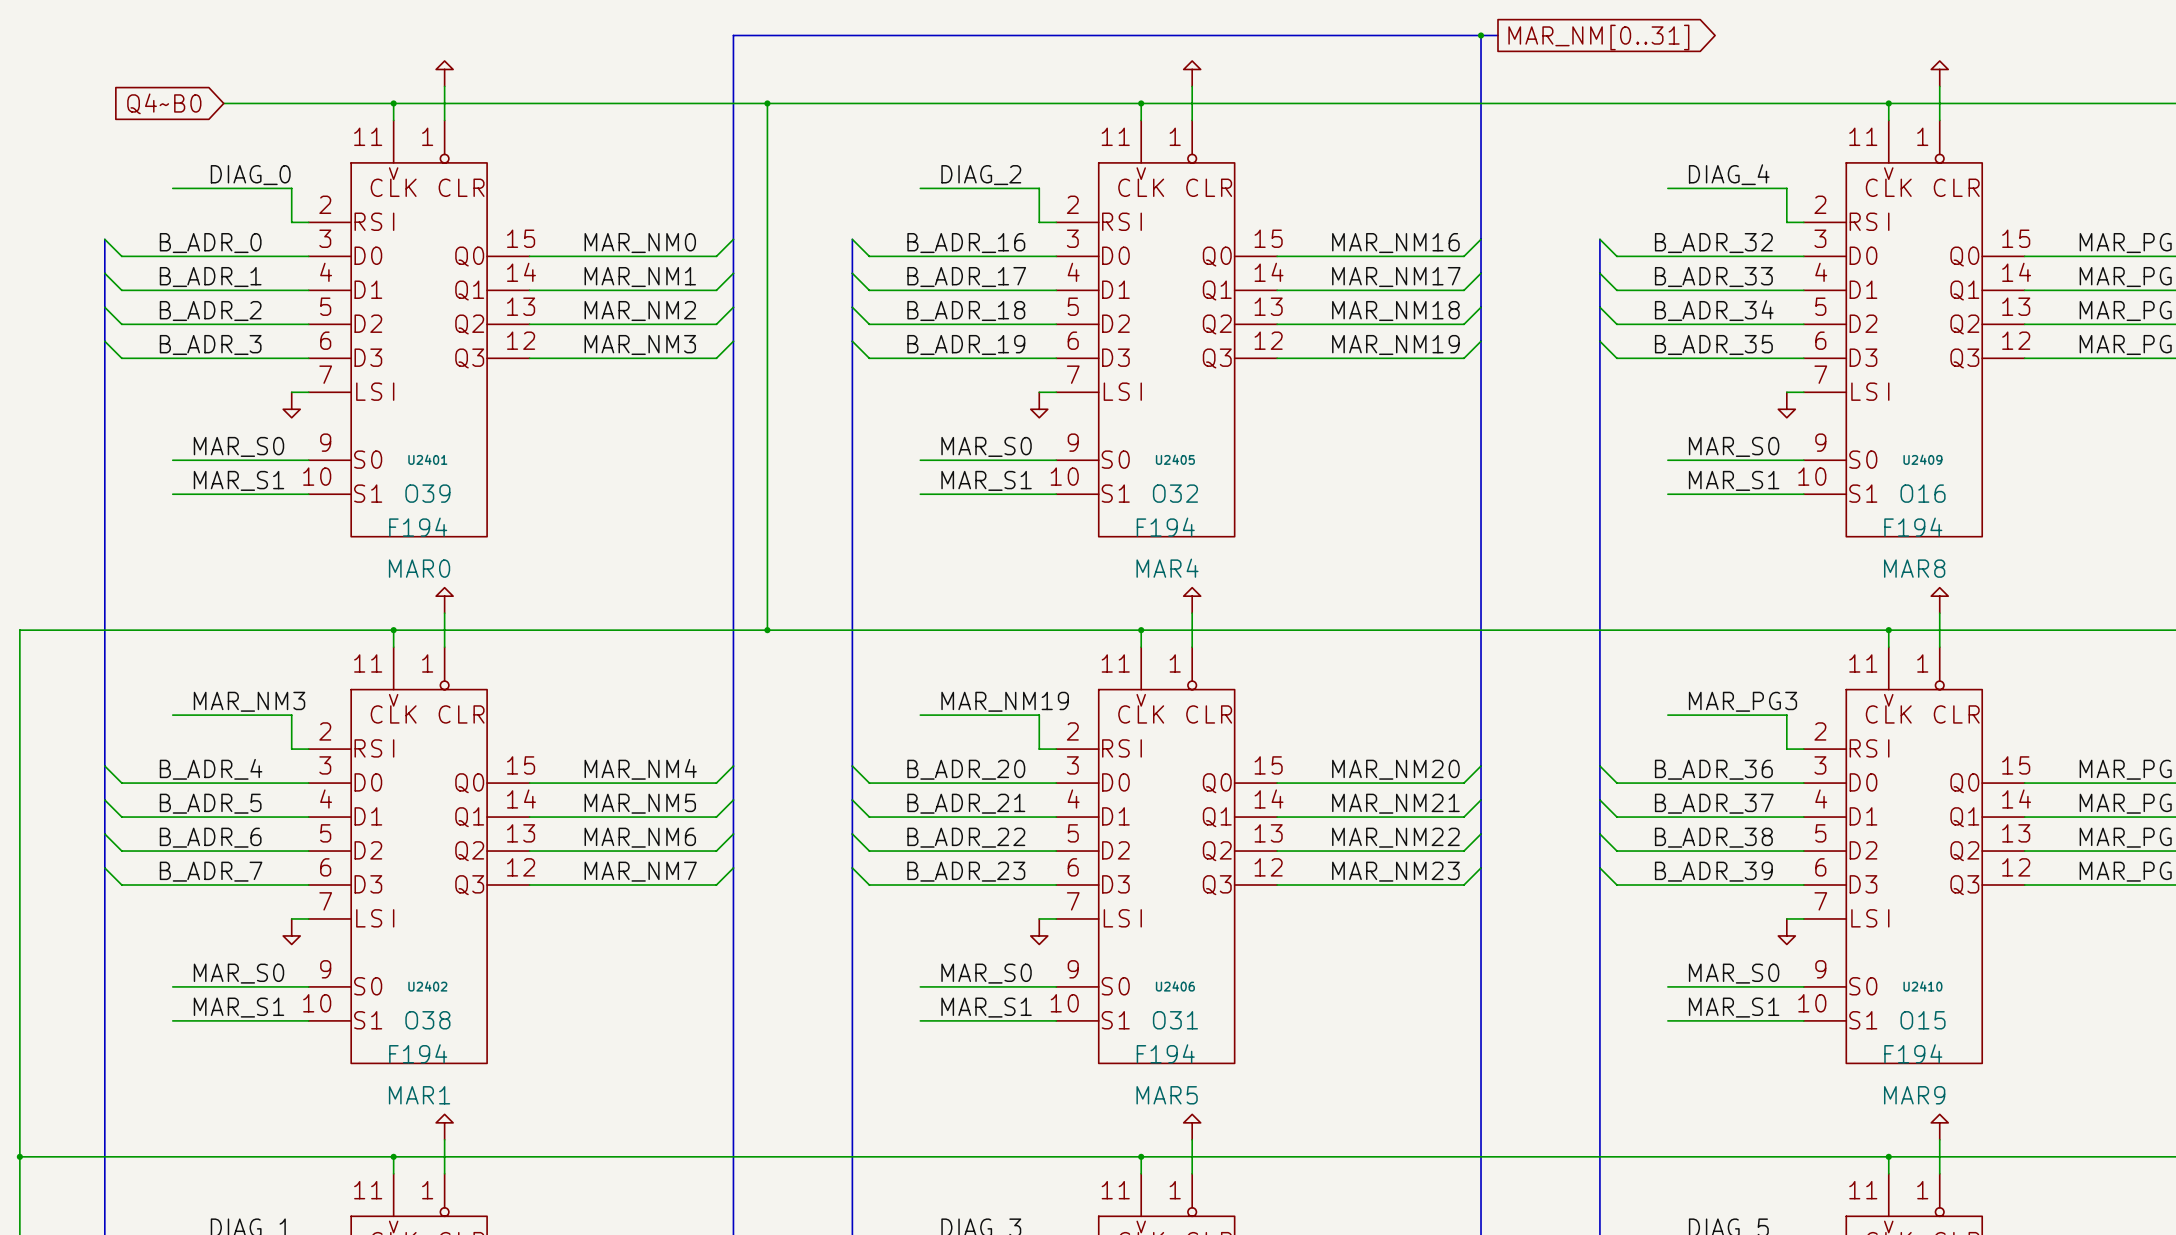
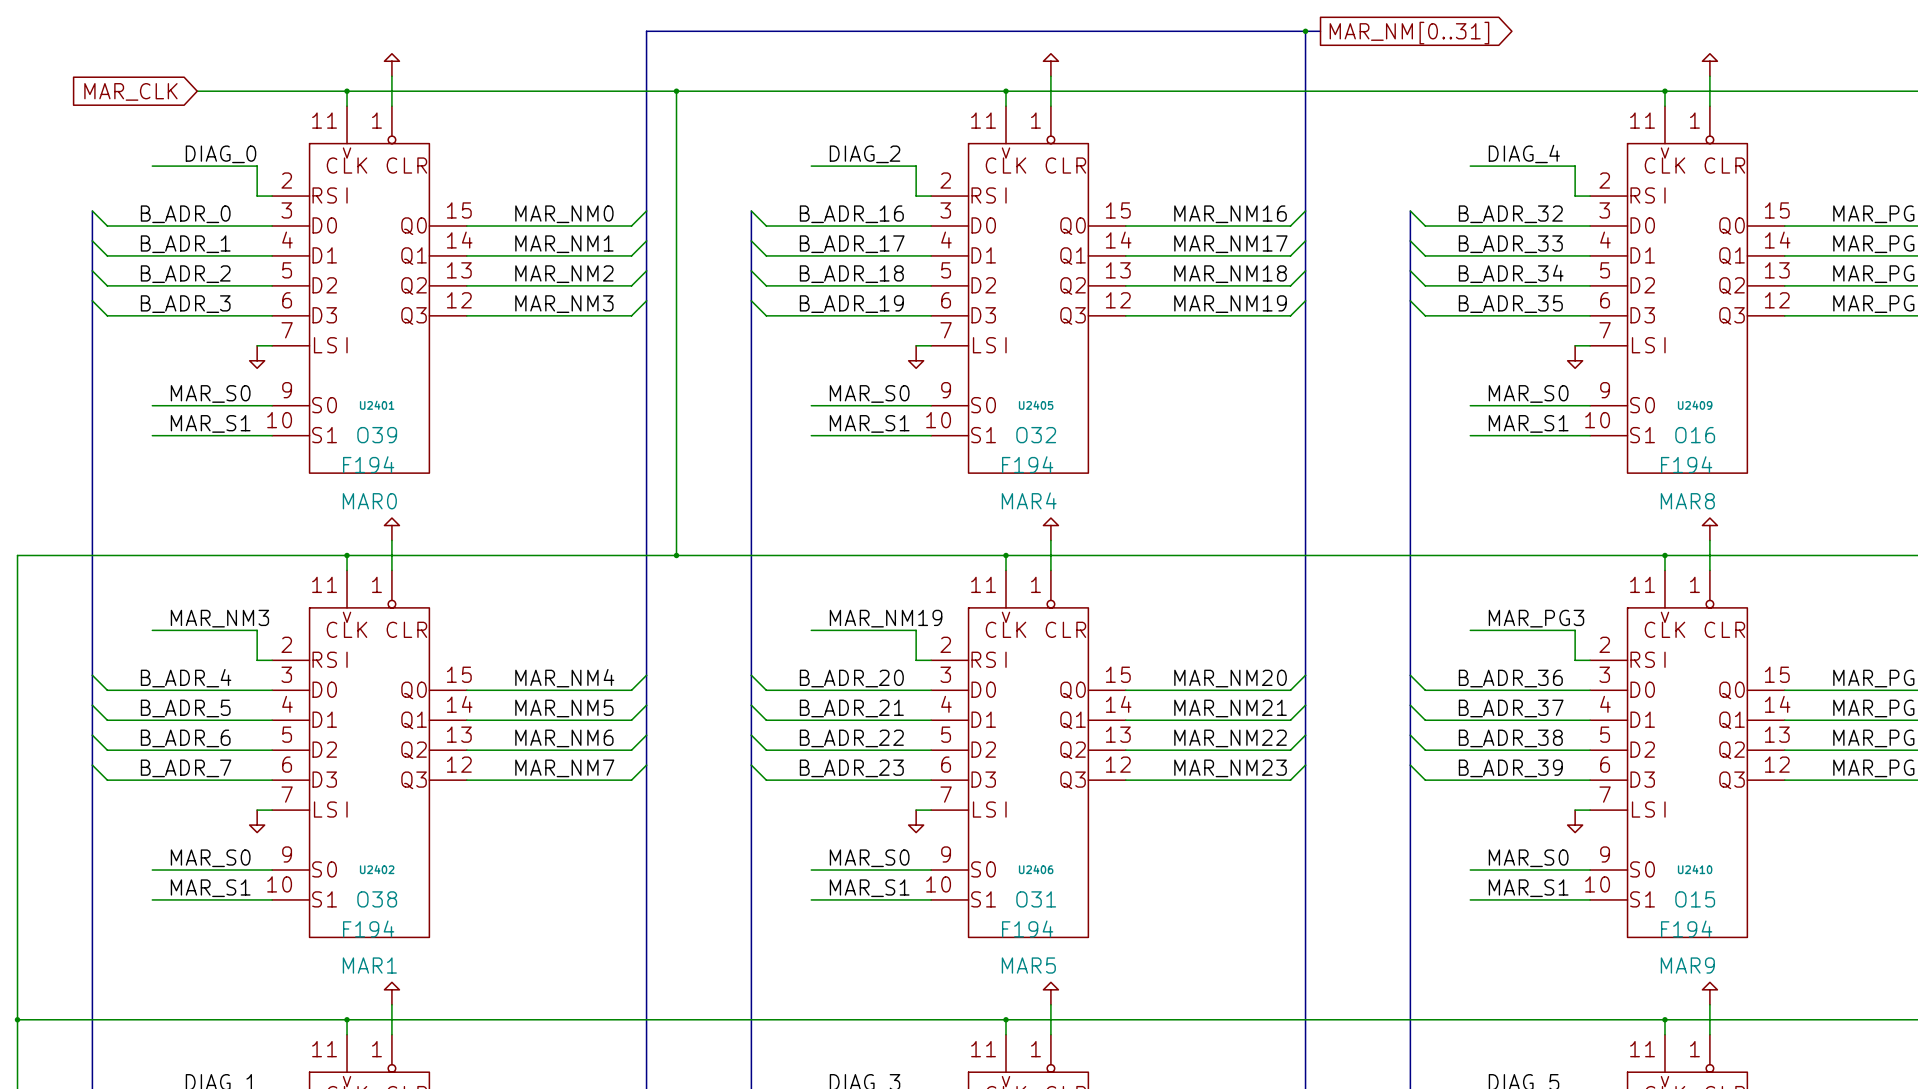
global label: Q4~B0 (164, 103) -> MAR_CLK (130, 91)

